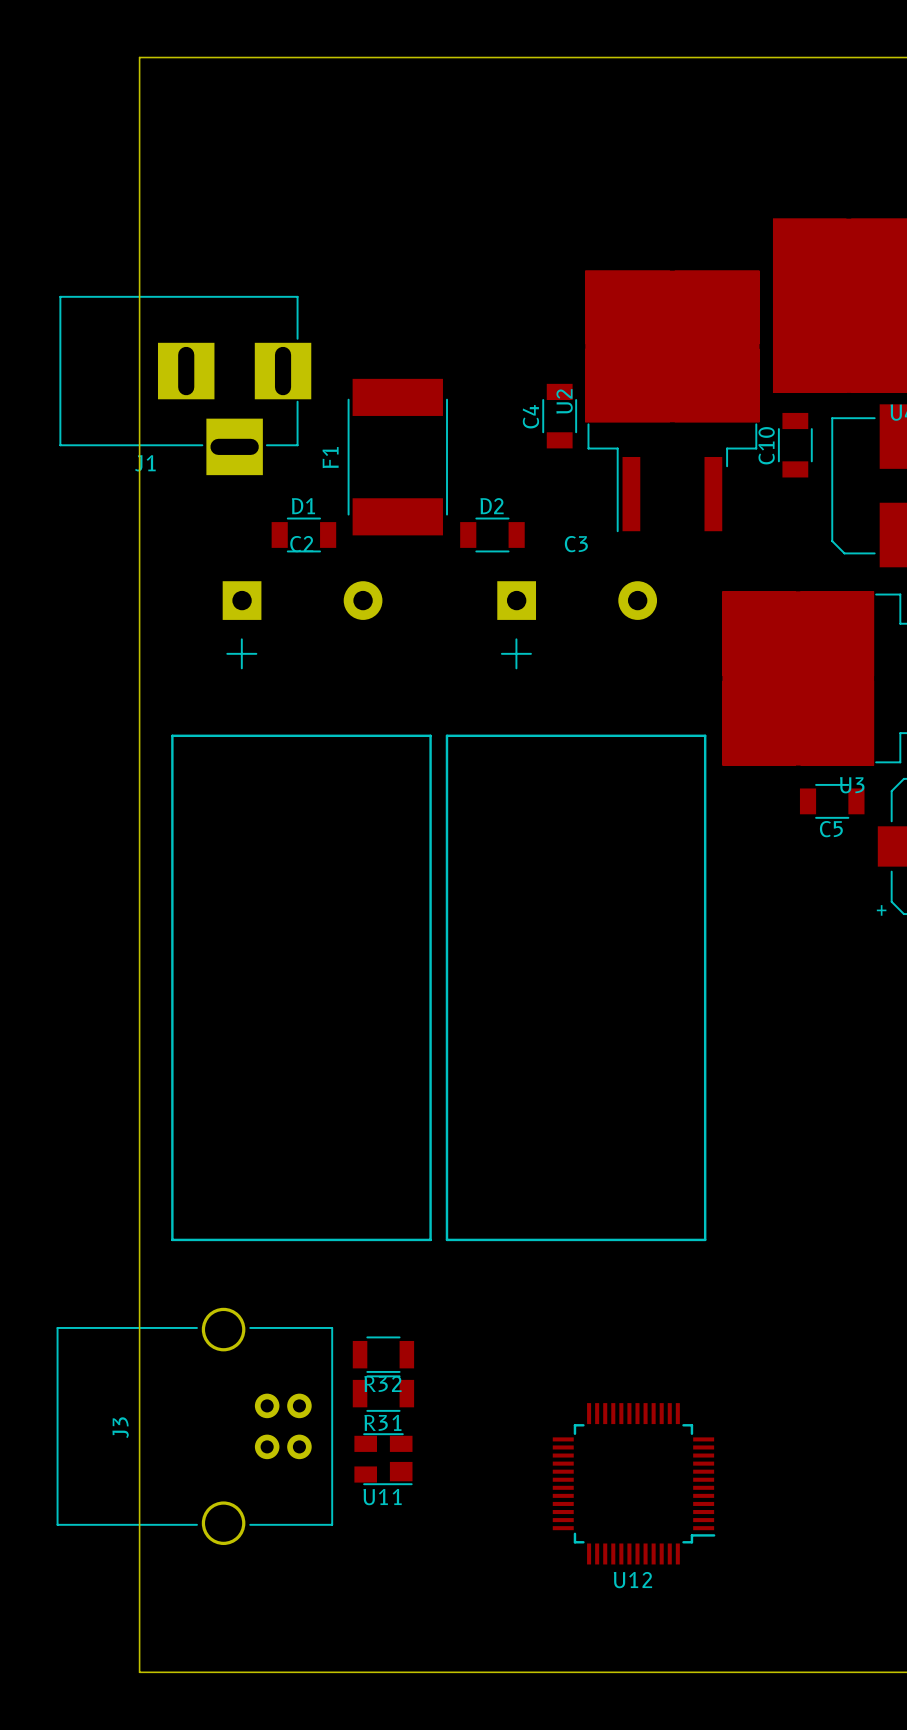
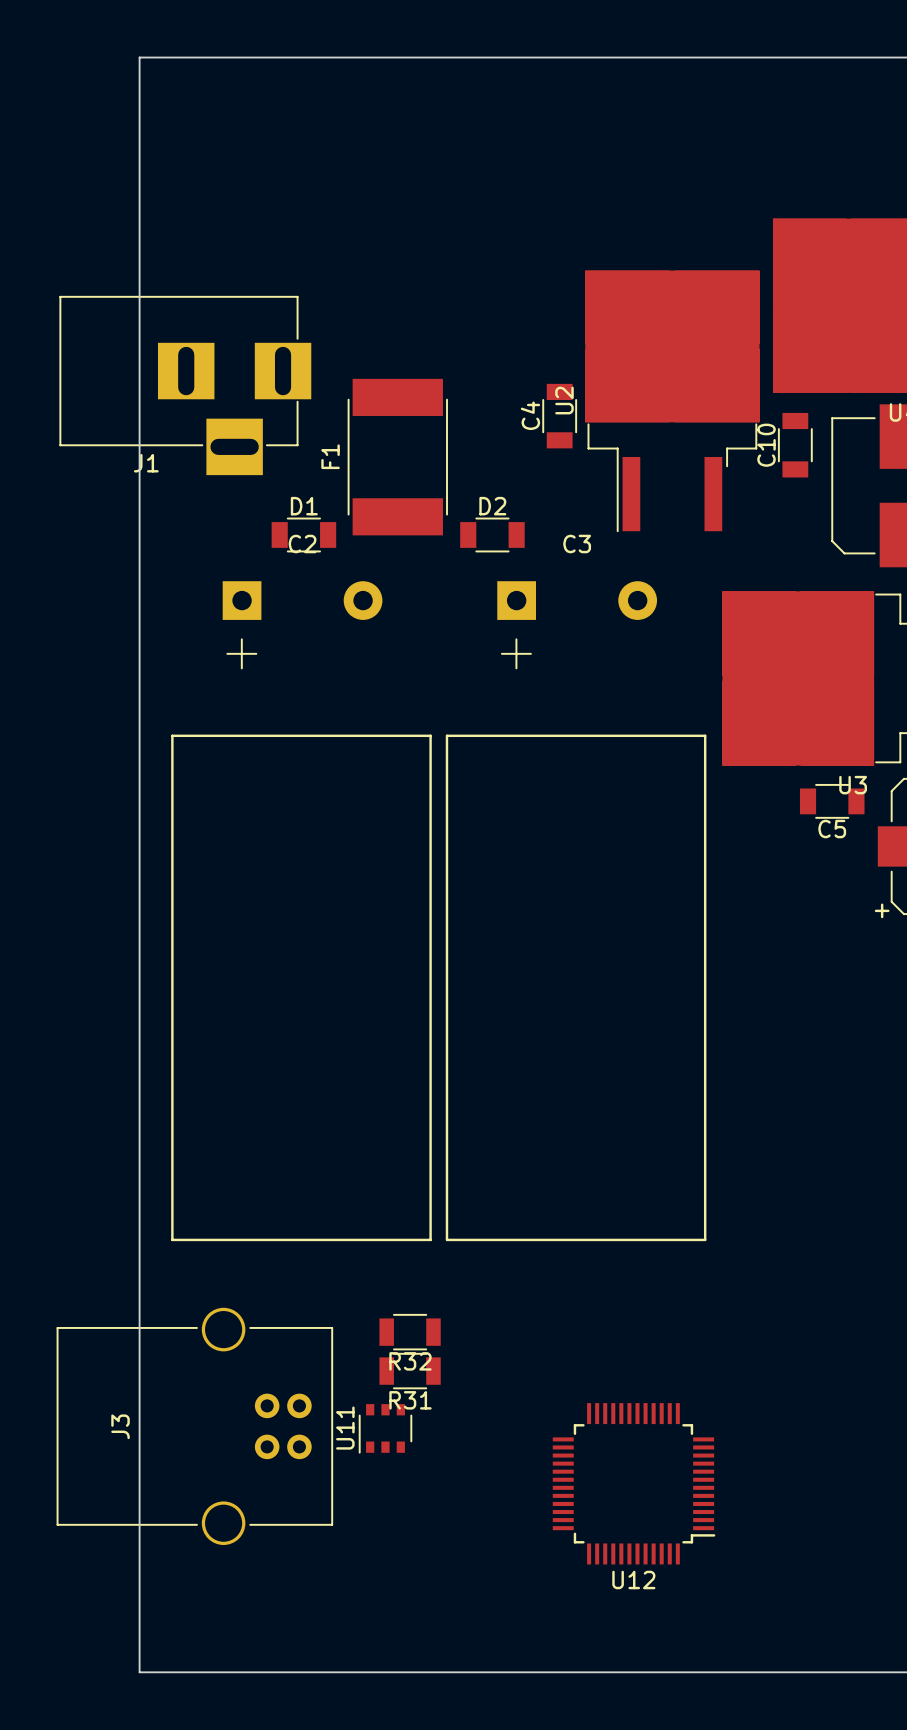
R32 position: (383, 1354) -> (410, 1332)
R31 position: (383, 1393) -> (410, 1371)
U11 footprint: [354, 1433, 413, 1486] -> [358, 1404, 413, 1454]
U11 name position: U11 (382, 1497) -> U11 (345, 1428)

